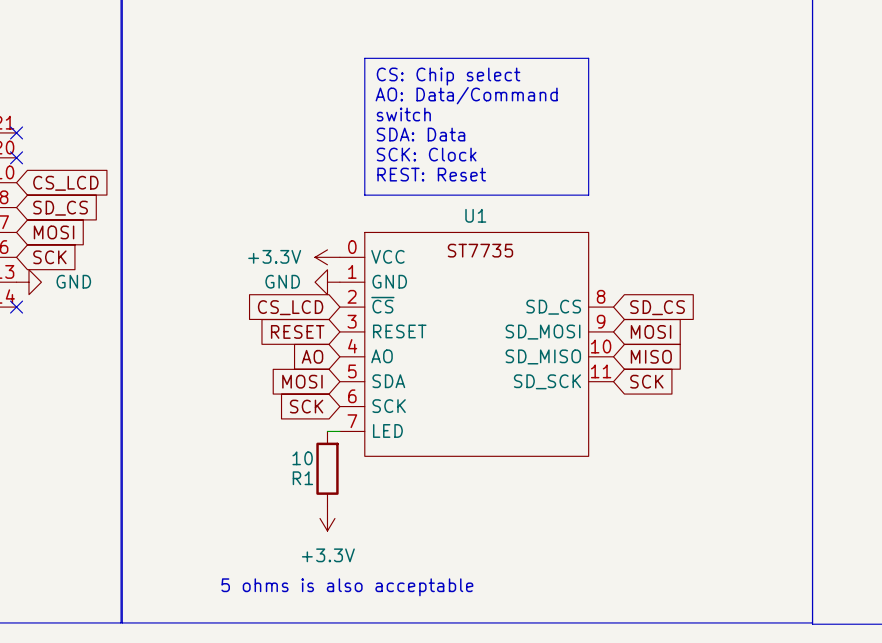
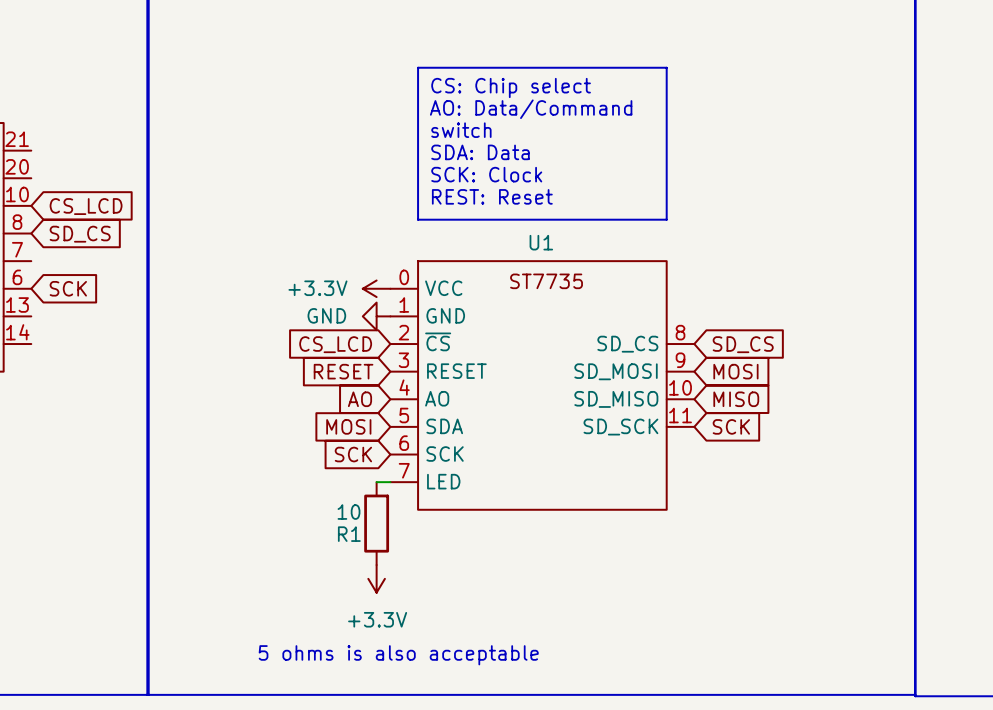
no-connect mark: (16, 132) -> none
no-connect mark: (16, 157) -> none
global label: MOSI (54, 232) -> none
power symbol: GND (28, 282) -> none
no-connect mark: (16, 307) -> none

